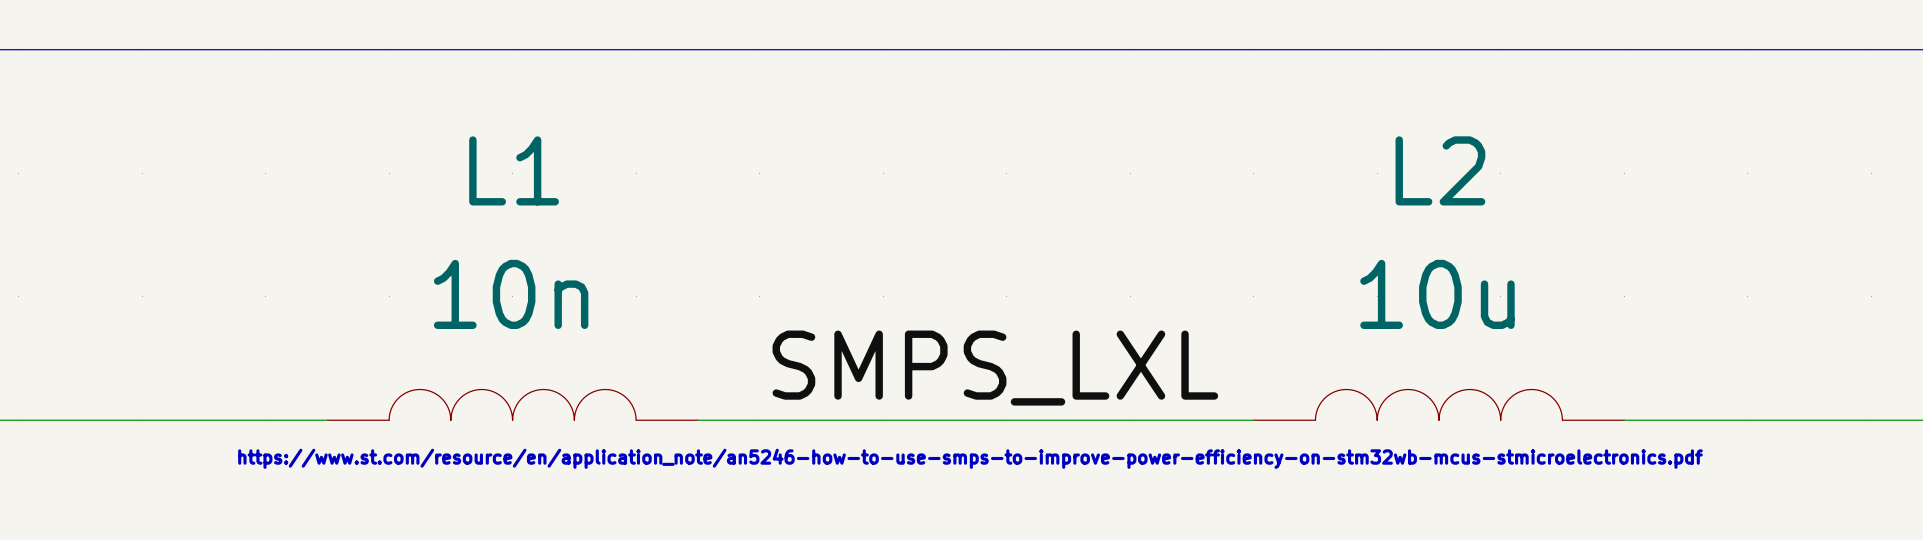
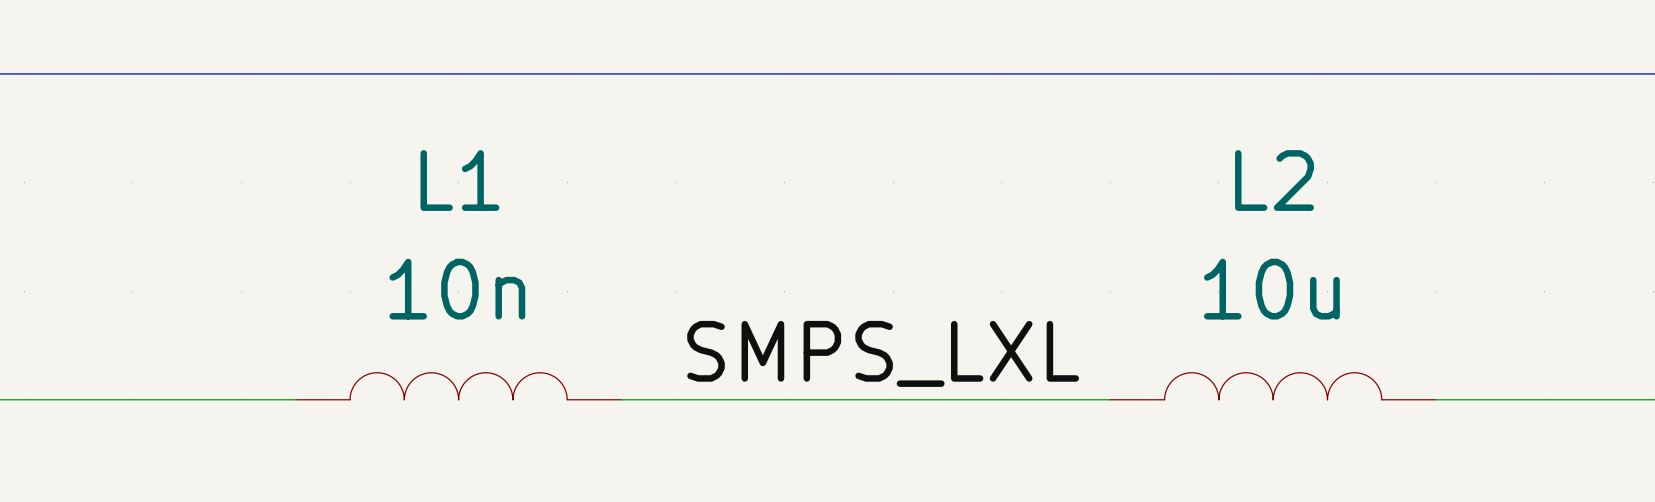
text: https://www.st.com/resource/en/application_note/an5246-how-to-use-smps-to-improve-power-efficiency-on-stm32wb-mcus-stmicroelectronics.pdf (970, 458) -> none

